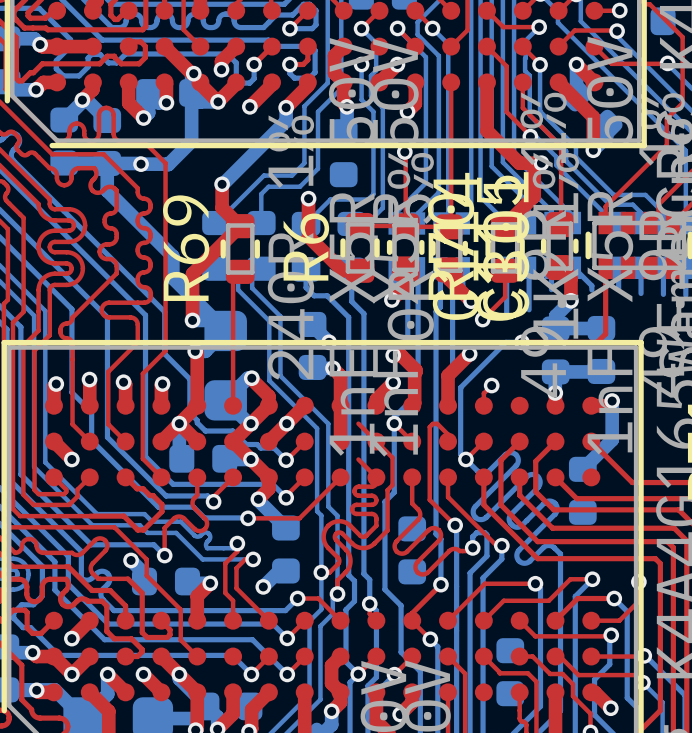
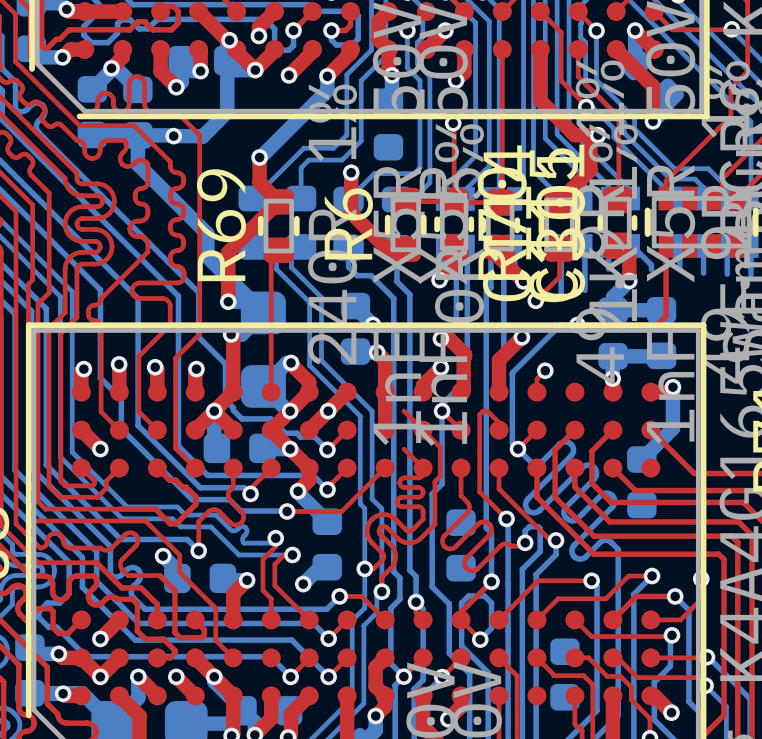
bottom track: (430, 639) (437, 646) (437, 670) -> (480, 639) (491, 628) (491, 603) (484, 595) (468, 595) (461, 603) (461, 645) (488, 672)

